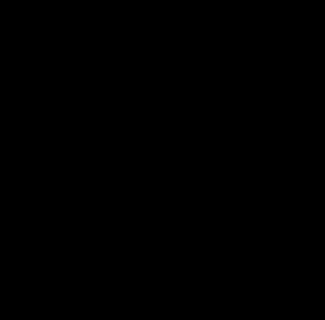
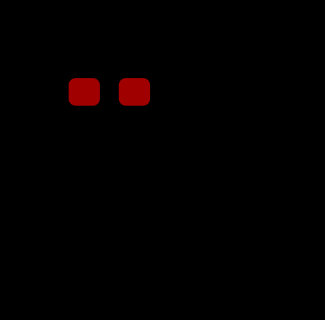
part: none -> (109, 91)

